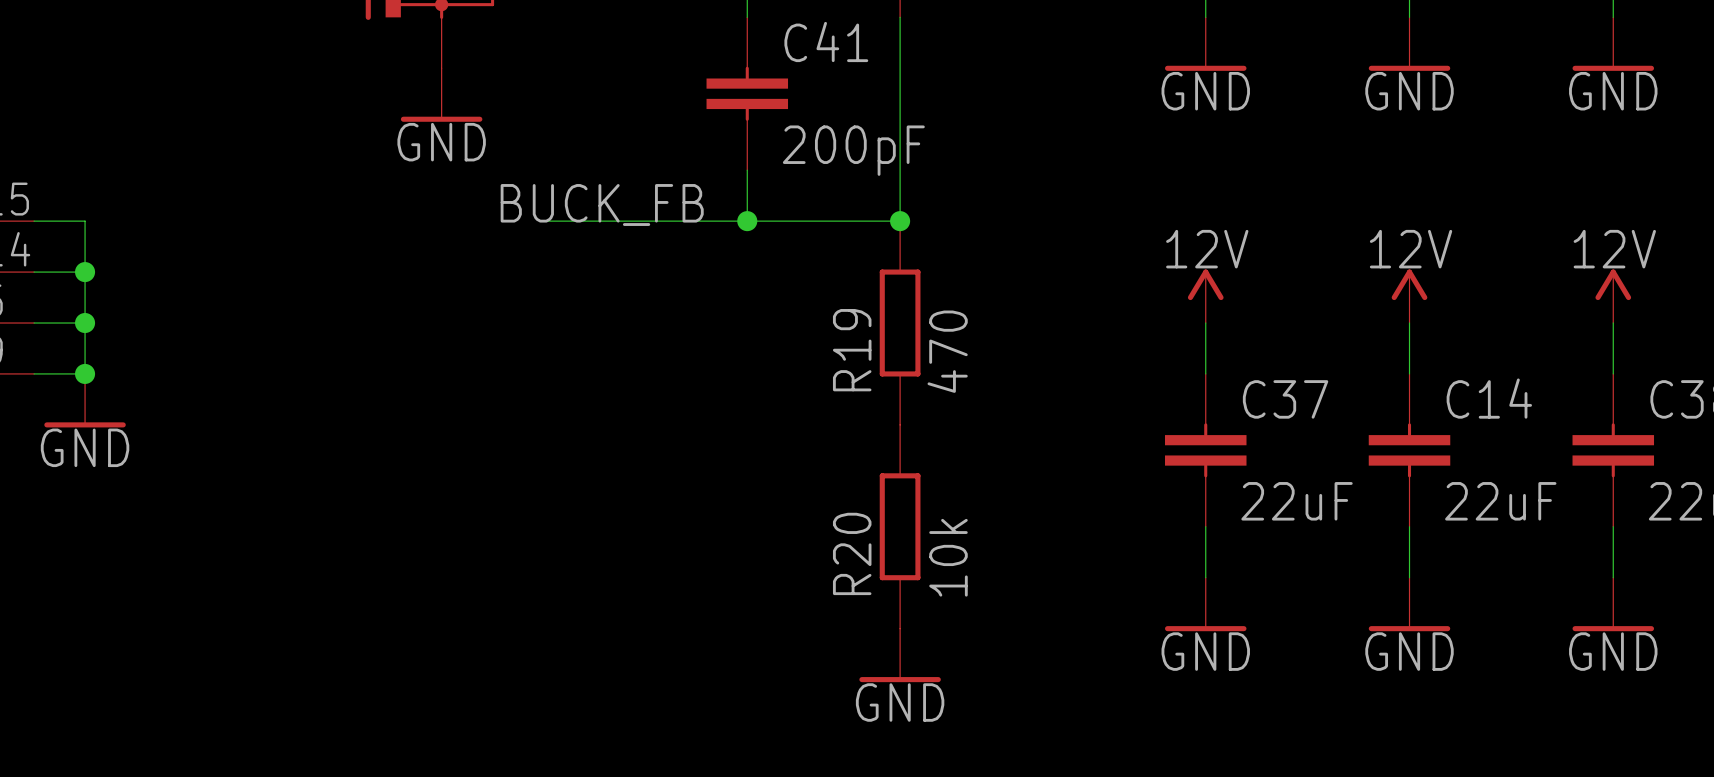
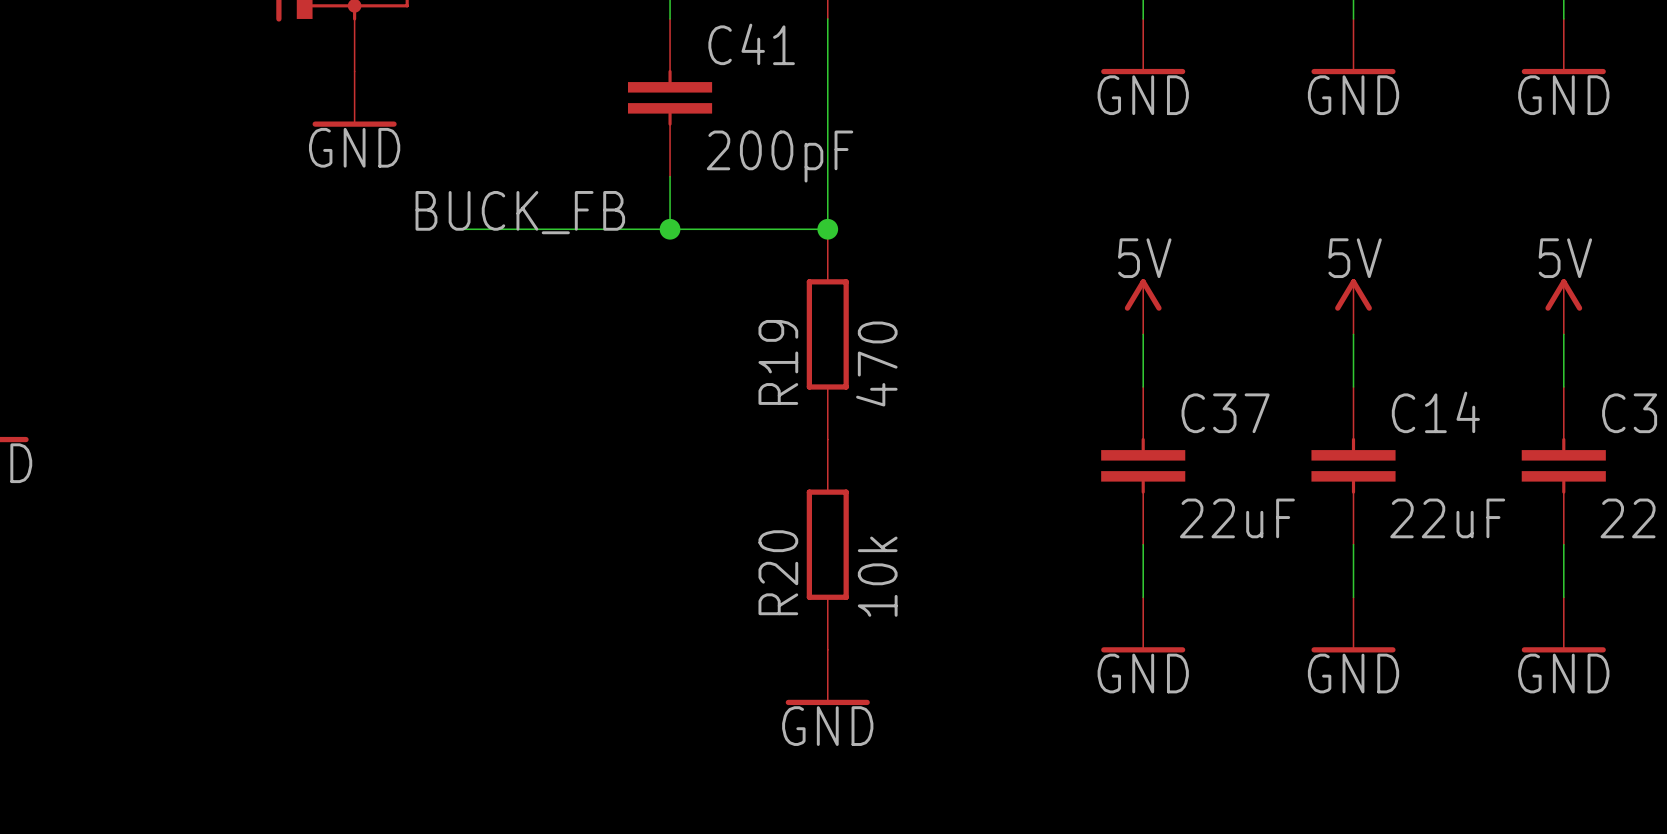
power symbol: 12V (1205, 296) -> 5V (1143, 306)
power symbol: 12V (1409, 296) -> 5V (1353, 306)
power symbol: 12V (1613, 296) -> 5V (1563, 306)

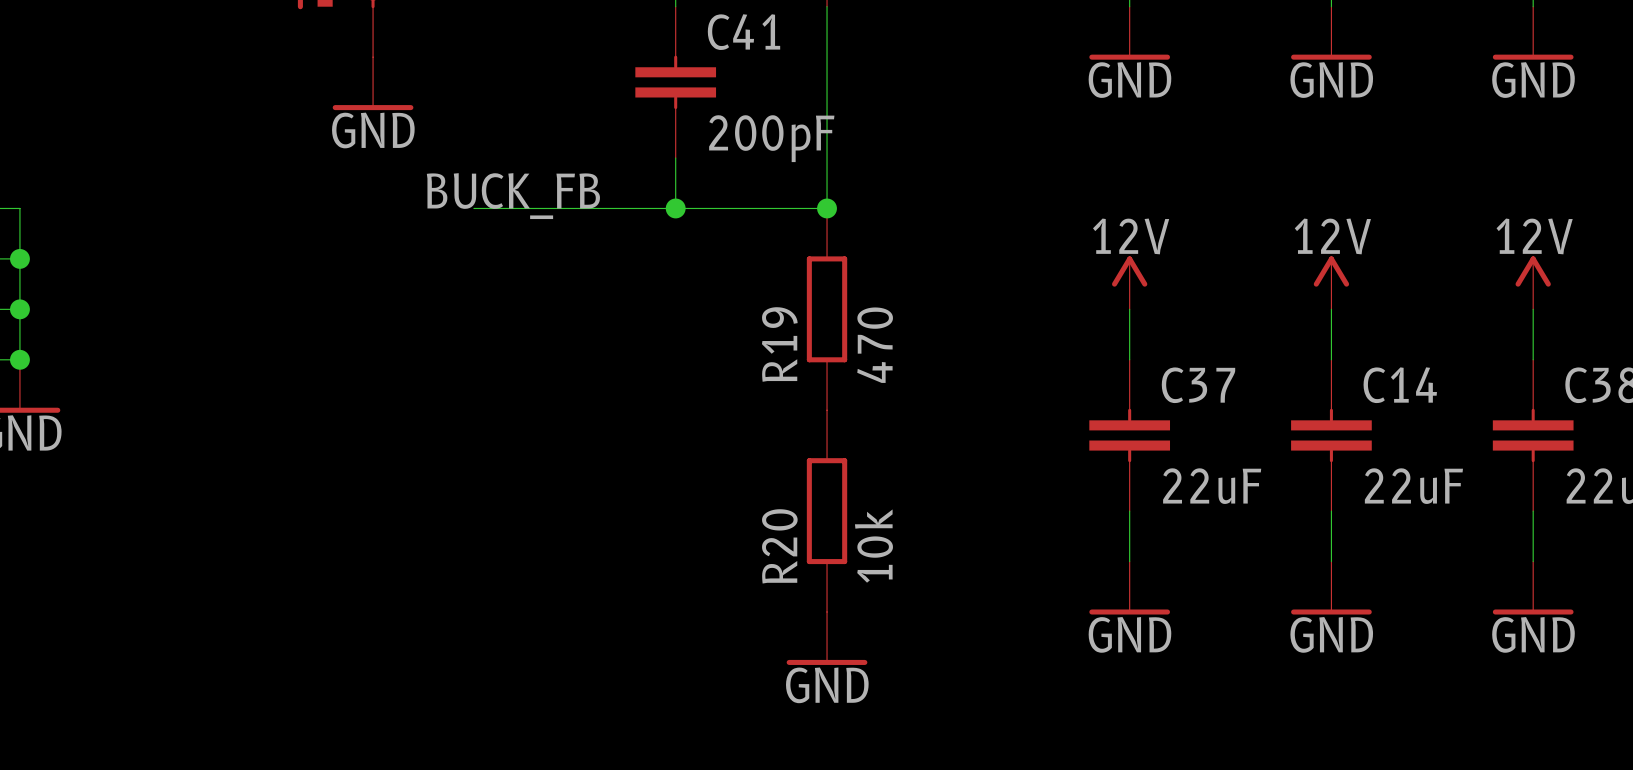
power symbol: 5V (1143, 306) -> 12V (1129, 282)
power symbol: 5V (1353, 306) -> 12V (1331, 282)
power symbol: 5V (1563, 306) -> 12V (1533, 282)

